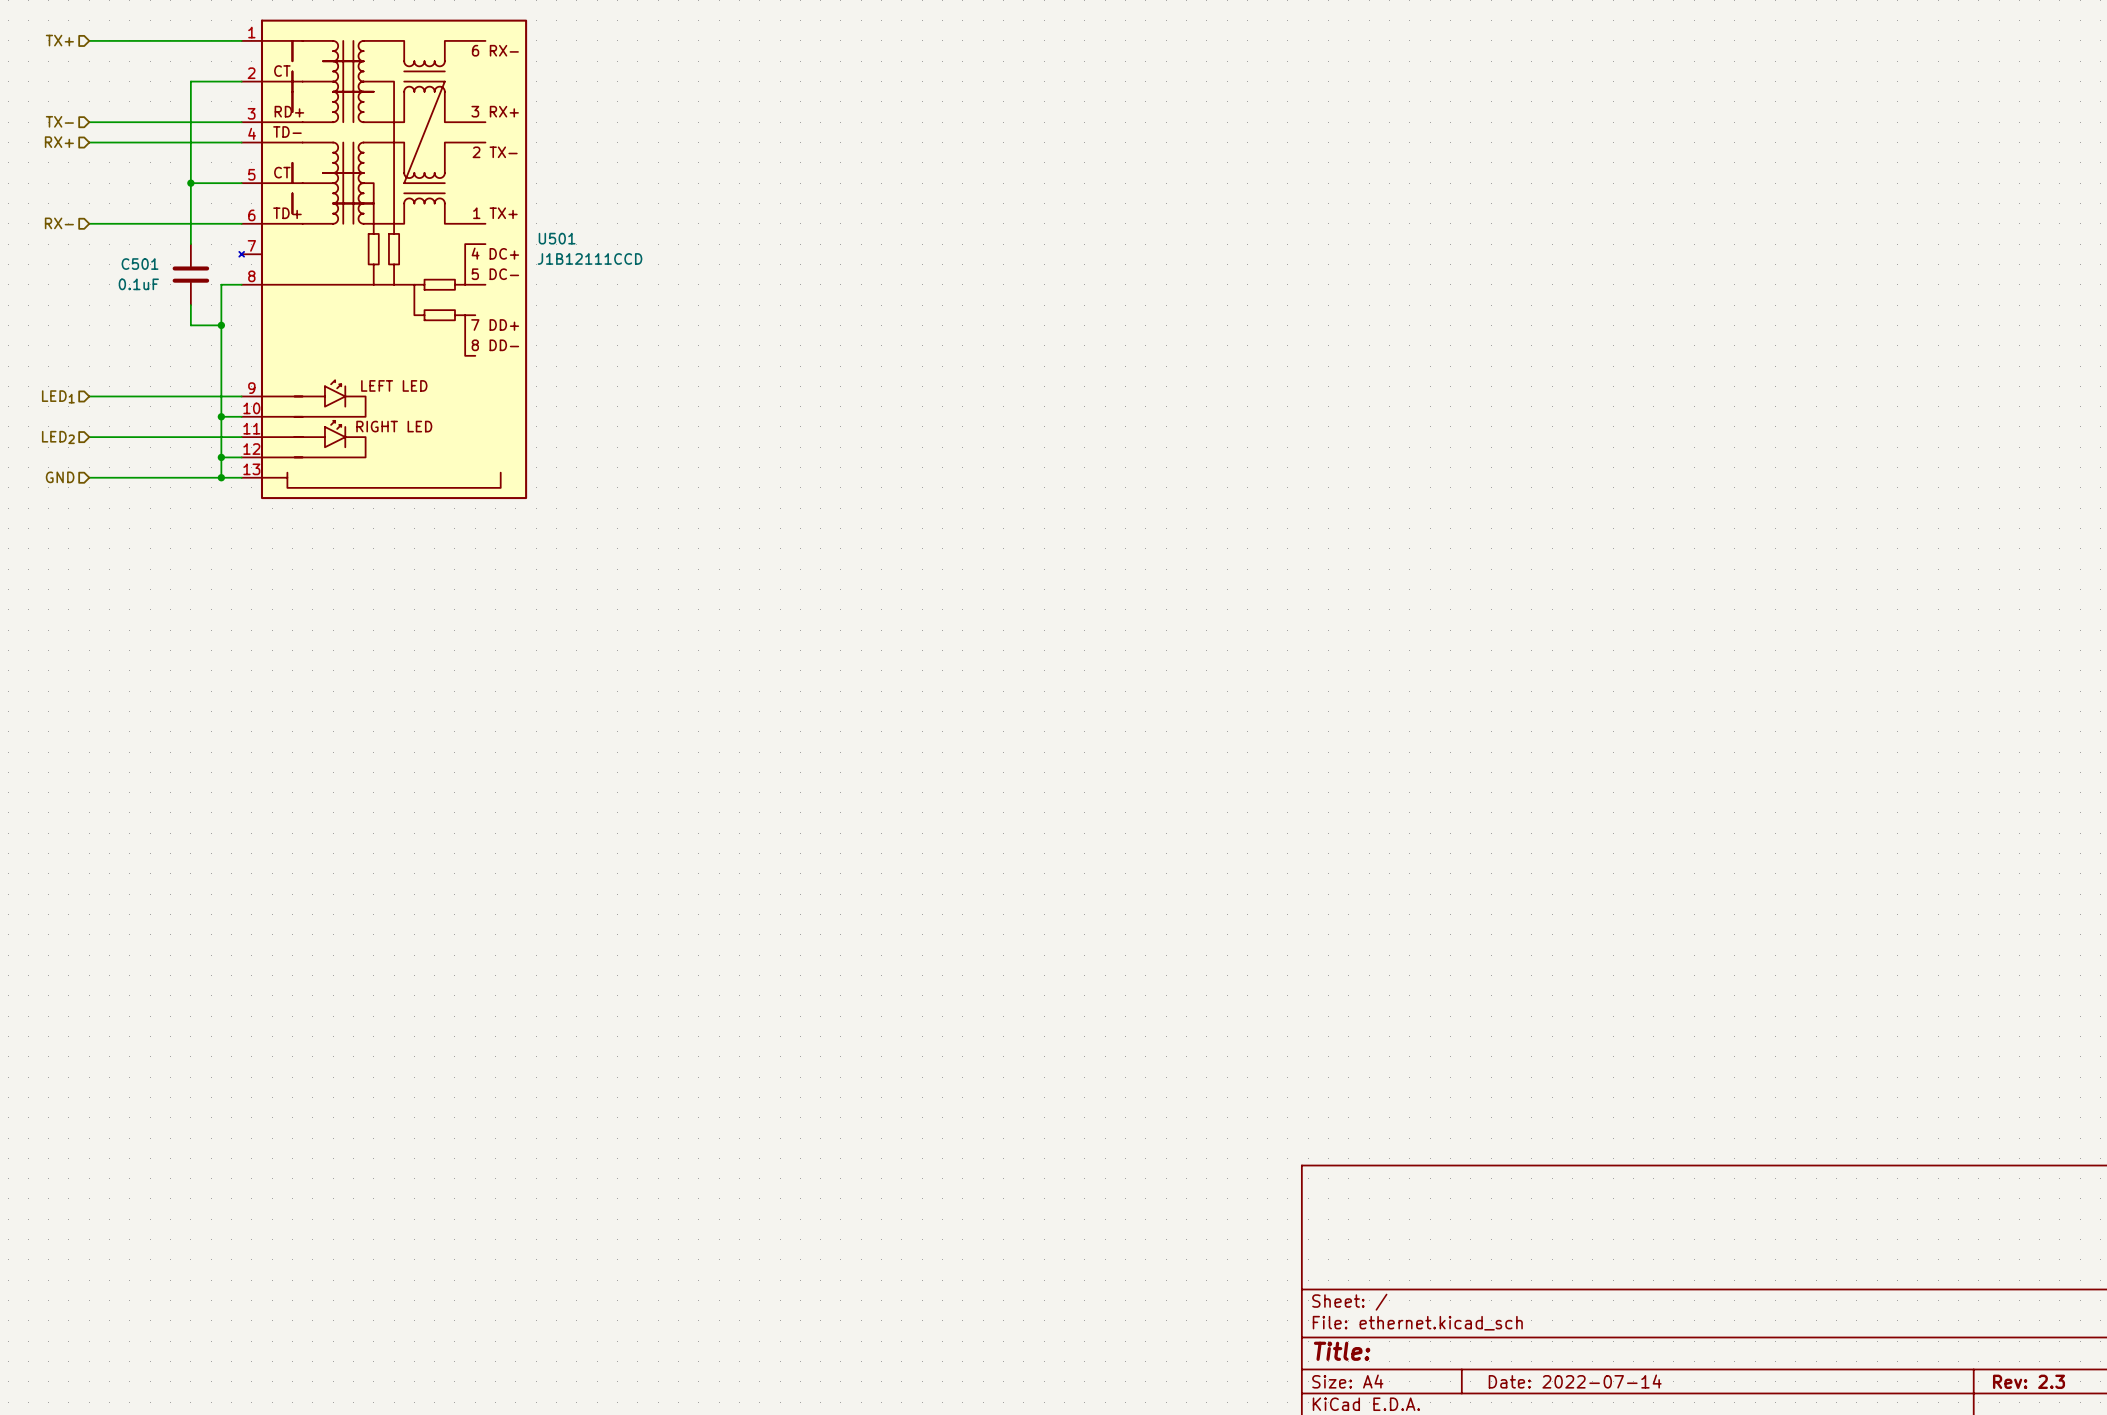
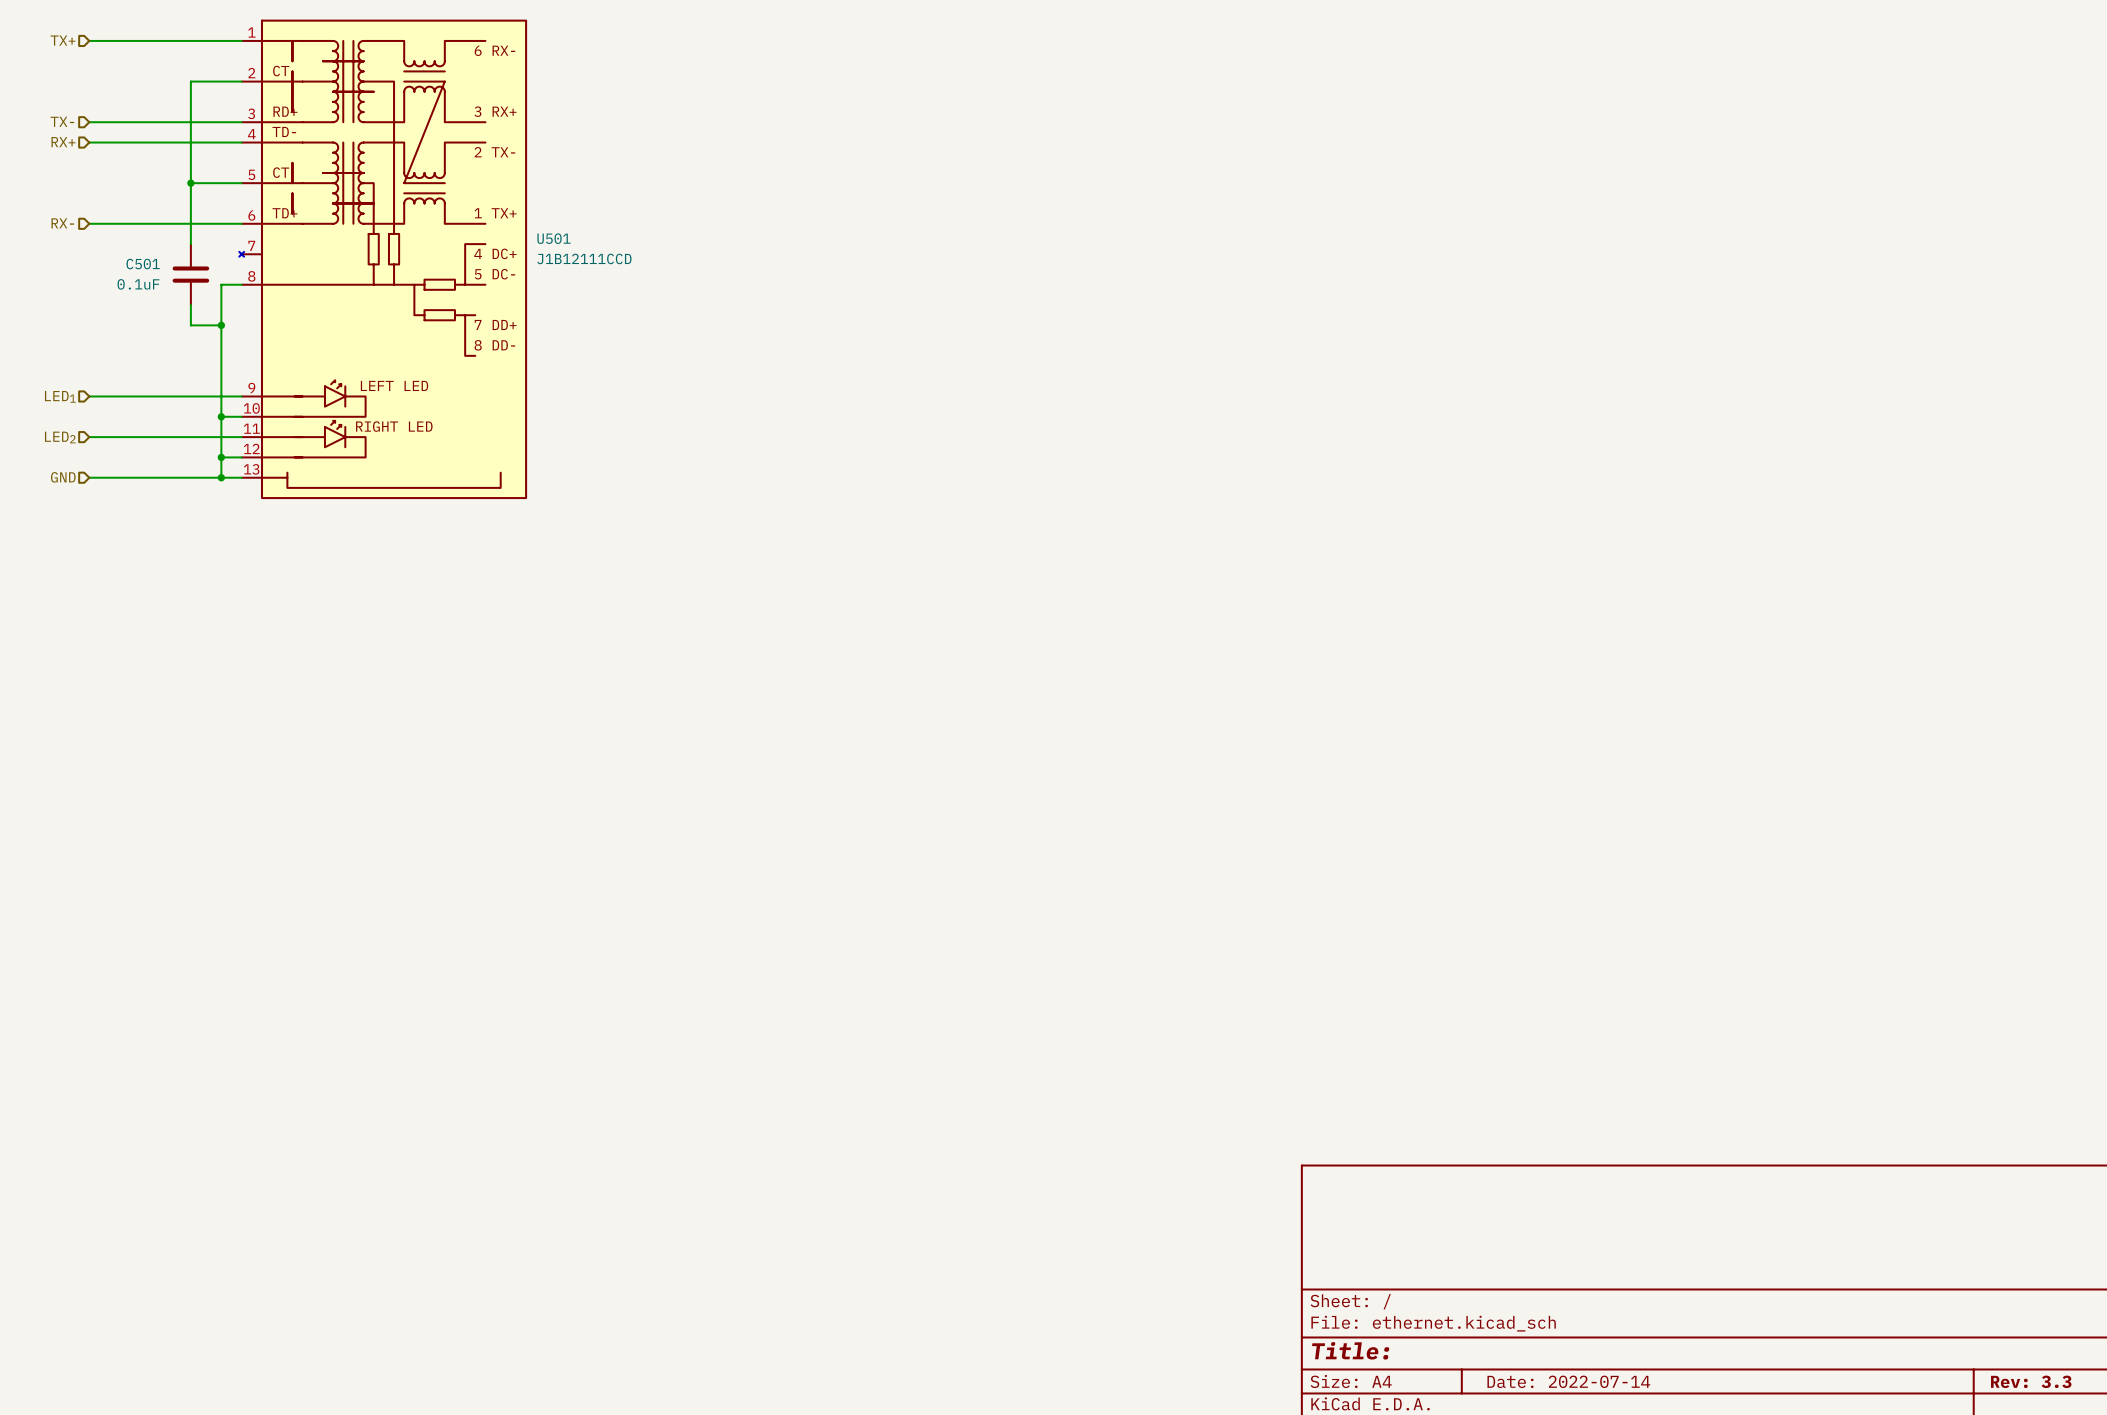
title block: Rev: 2.3 (2029, 1381) -> Rev: 3.3 (2031, 1381)

